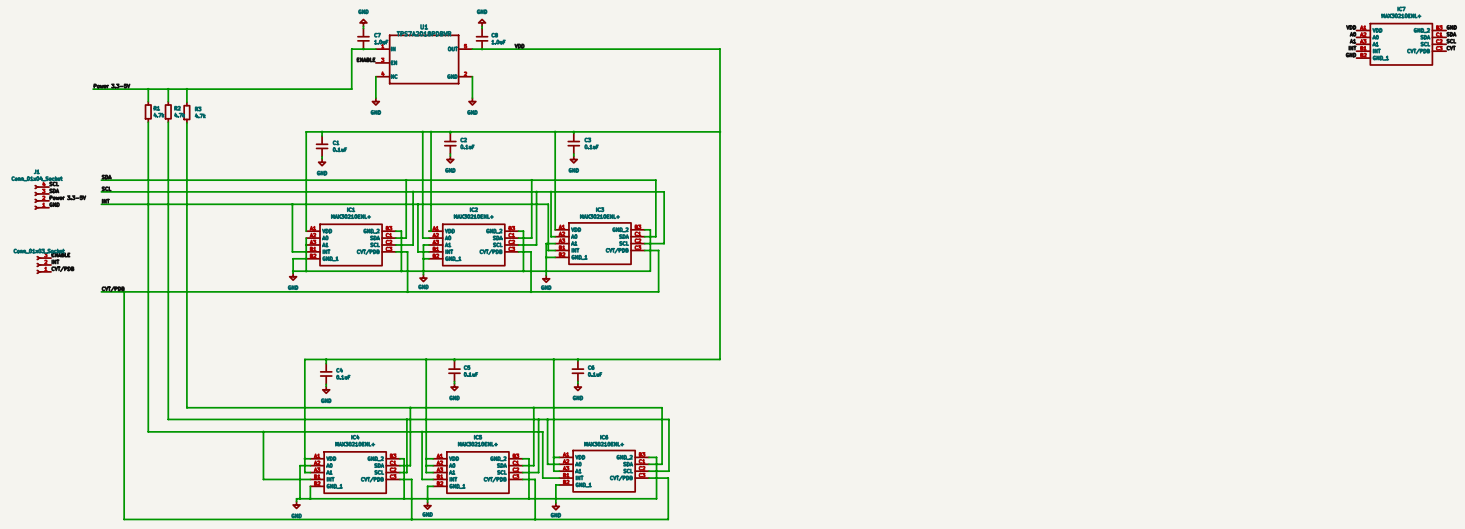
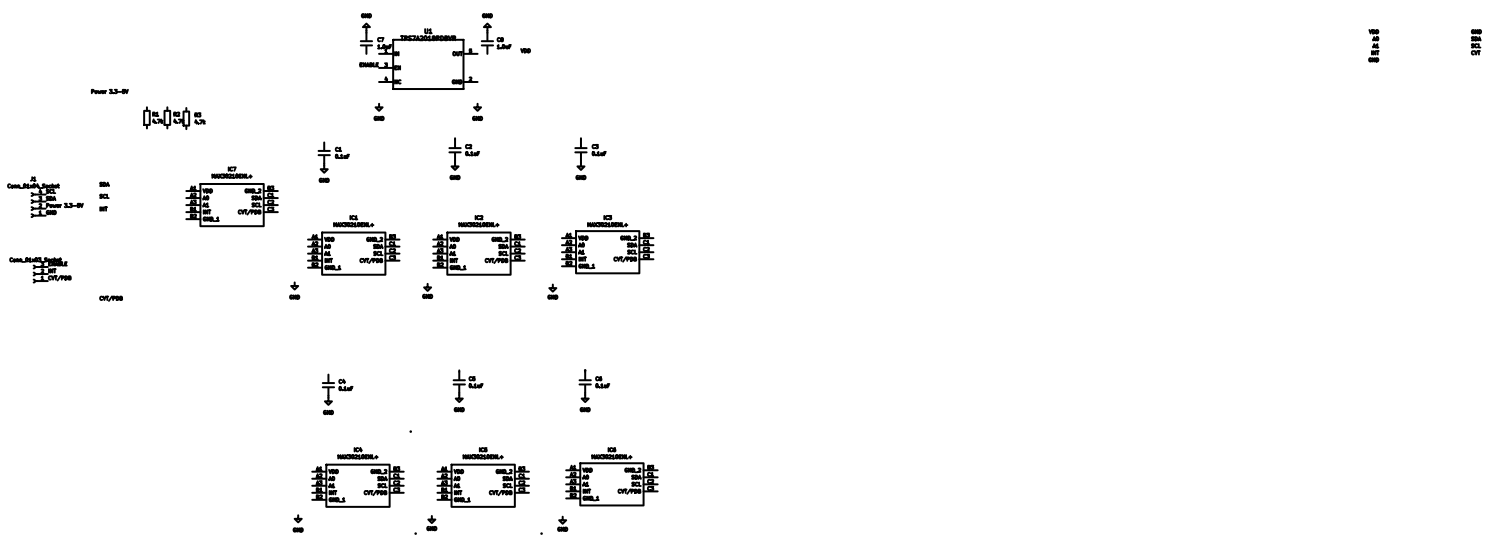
part position: (1401, 44) -> (232, 205)
wire: (375, 49) (351, 49) (351, 89) (93, 89) -> none
wire: (472, 49) (720, 49) (720, 359) (304, 359) (304, 472) (310, 472) -> none
wire: (375, 76) (375, 98) -> none
wire: (472, 76) (472, 98) -> none
wire: (148, 89) (148, 101) -> none
wire: (168, 89) (168, 101) -> none
wire: (186, 89) (186, 102) -> none
wire: (148, 122) (148, 431) (542, 431) (542, 478) (559, 478) -> none
wire: (168, 122) (168, 419) (668, 419) (668, 471) (648, 471) -> none
wire: (186, 122) (186, 407) (662, 407) (662, 464) (648, 464) -> none
wire: (322, 131) (322, 136) -> none
wire: (422, 131) (422, 238) (428, 238) -> none
wire: (431, 131) (431, 231) (428, 231) -> none
wire: (555, 131) (555, 229) -> none
wire: (720, 131) (306, 131) (306, 231) -> none
wire: (101, 180) (655, 180) (655, 236) (644, 236) -> none
wire: (406, 180) (406, 238) (395, 238) -> none
wire: (531, 180) (531, 238) (518, 238) -> none
wire: (101, 191) (664, 191) (664, 243) (644, 243) -> none
wire: (413, 191) (413, 244) (395, 244) -> none
wire: (536, 191) (536, 244) (518, 244) -> none
wire: (551, 191) (551, 236) (555, 236) -> none
wire: (101, 204) (548, 204) (548, 250) (555, 250) -> none
wire: (292, 204) (292, 251) (306, 251) -> none
wire: (417, 204) (417, 251) (428, 251) -> none
wire: (644, 229) (650, 229) (650, 271) (293, 271) -> none
wire: (395, 231) (401, 231) (401, 271) -> none
wire: (518, 231) (523, 231) (523, 271) -> none
wire: (306, 238) (306, 271) -> none
wire: (555, 243) (546, 243) (546, 275) -> none
wire: (428, 244) (423, 244) (423, 274) -> none
wire: (644, 250) (658, 250) (658, 291) (101, 291) -> none
wire: (395, 251) (407, 251) (407, 291) -> none
wire: (518, 251) (531, 251) (531, 291) -> none
wire: (546, 257) (555, 257) -> none
wire: (306, 258) (293, 258) (293, 273) -> none
wire: (423, 258) (428, 258) -> none
wire: (124, 291) (124, 519) (668, 519) (668, 478) (648, 478) -> none
wire: (326, 359) (326, 363) -> none
wire: (426, 359) (426, 472) (433, 472) -> none
wire: (553, 359) (553, 471) (559, 471) -> none
wire: (410, 407) (410, 465) (400, 465) -> none
wire: (533, 407) (533, 465) (522, 465) -> none
wire: (406, 419) (406, 472) (400, 472) -> none
wire: (538, 419) (538, 472) (522, 472) -> none
wire: (547, 419) (547, 464) (559, 464) -> none
wire: (263, 431) (263, 479) (310, 479) -> none
wire: (422, 431) (422, 479) (433, 479) -> none
wire: (553, 457) (559, 457) -> none
wire: (648, 457) (656, 457) (656, 498) (296, 498) (296, 501) -> none
wire: (304, 458) (310, 458) -> none
wire: (400, 458) (404, 458) (404, 498) -> none
wire: (426, 458) (433, 458) -> none
wire: (522, 458) (528, 458) (528, 498) -> none
wire: (310, 465) (300, 465) (300, 498) -> none
wire: (426, 465) (433, 465) -> none
wire: (400, 479) (411, 479) (411, 519) -> none
wire: (522, 479) (535, 479) (535, 519) -> none
wire: (559, 484) (555, 484) (555, 502) -> none
wire: (310, 486) (310, 498) -> none
wire: (433, 486) (427, 486) (427, 502) -> none

